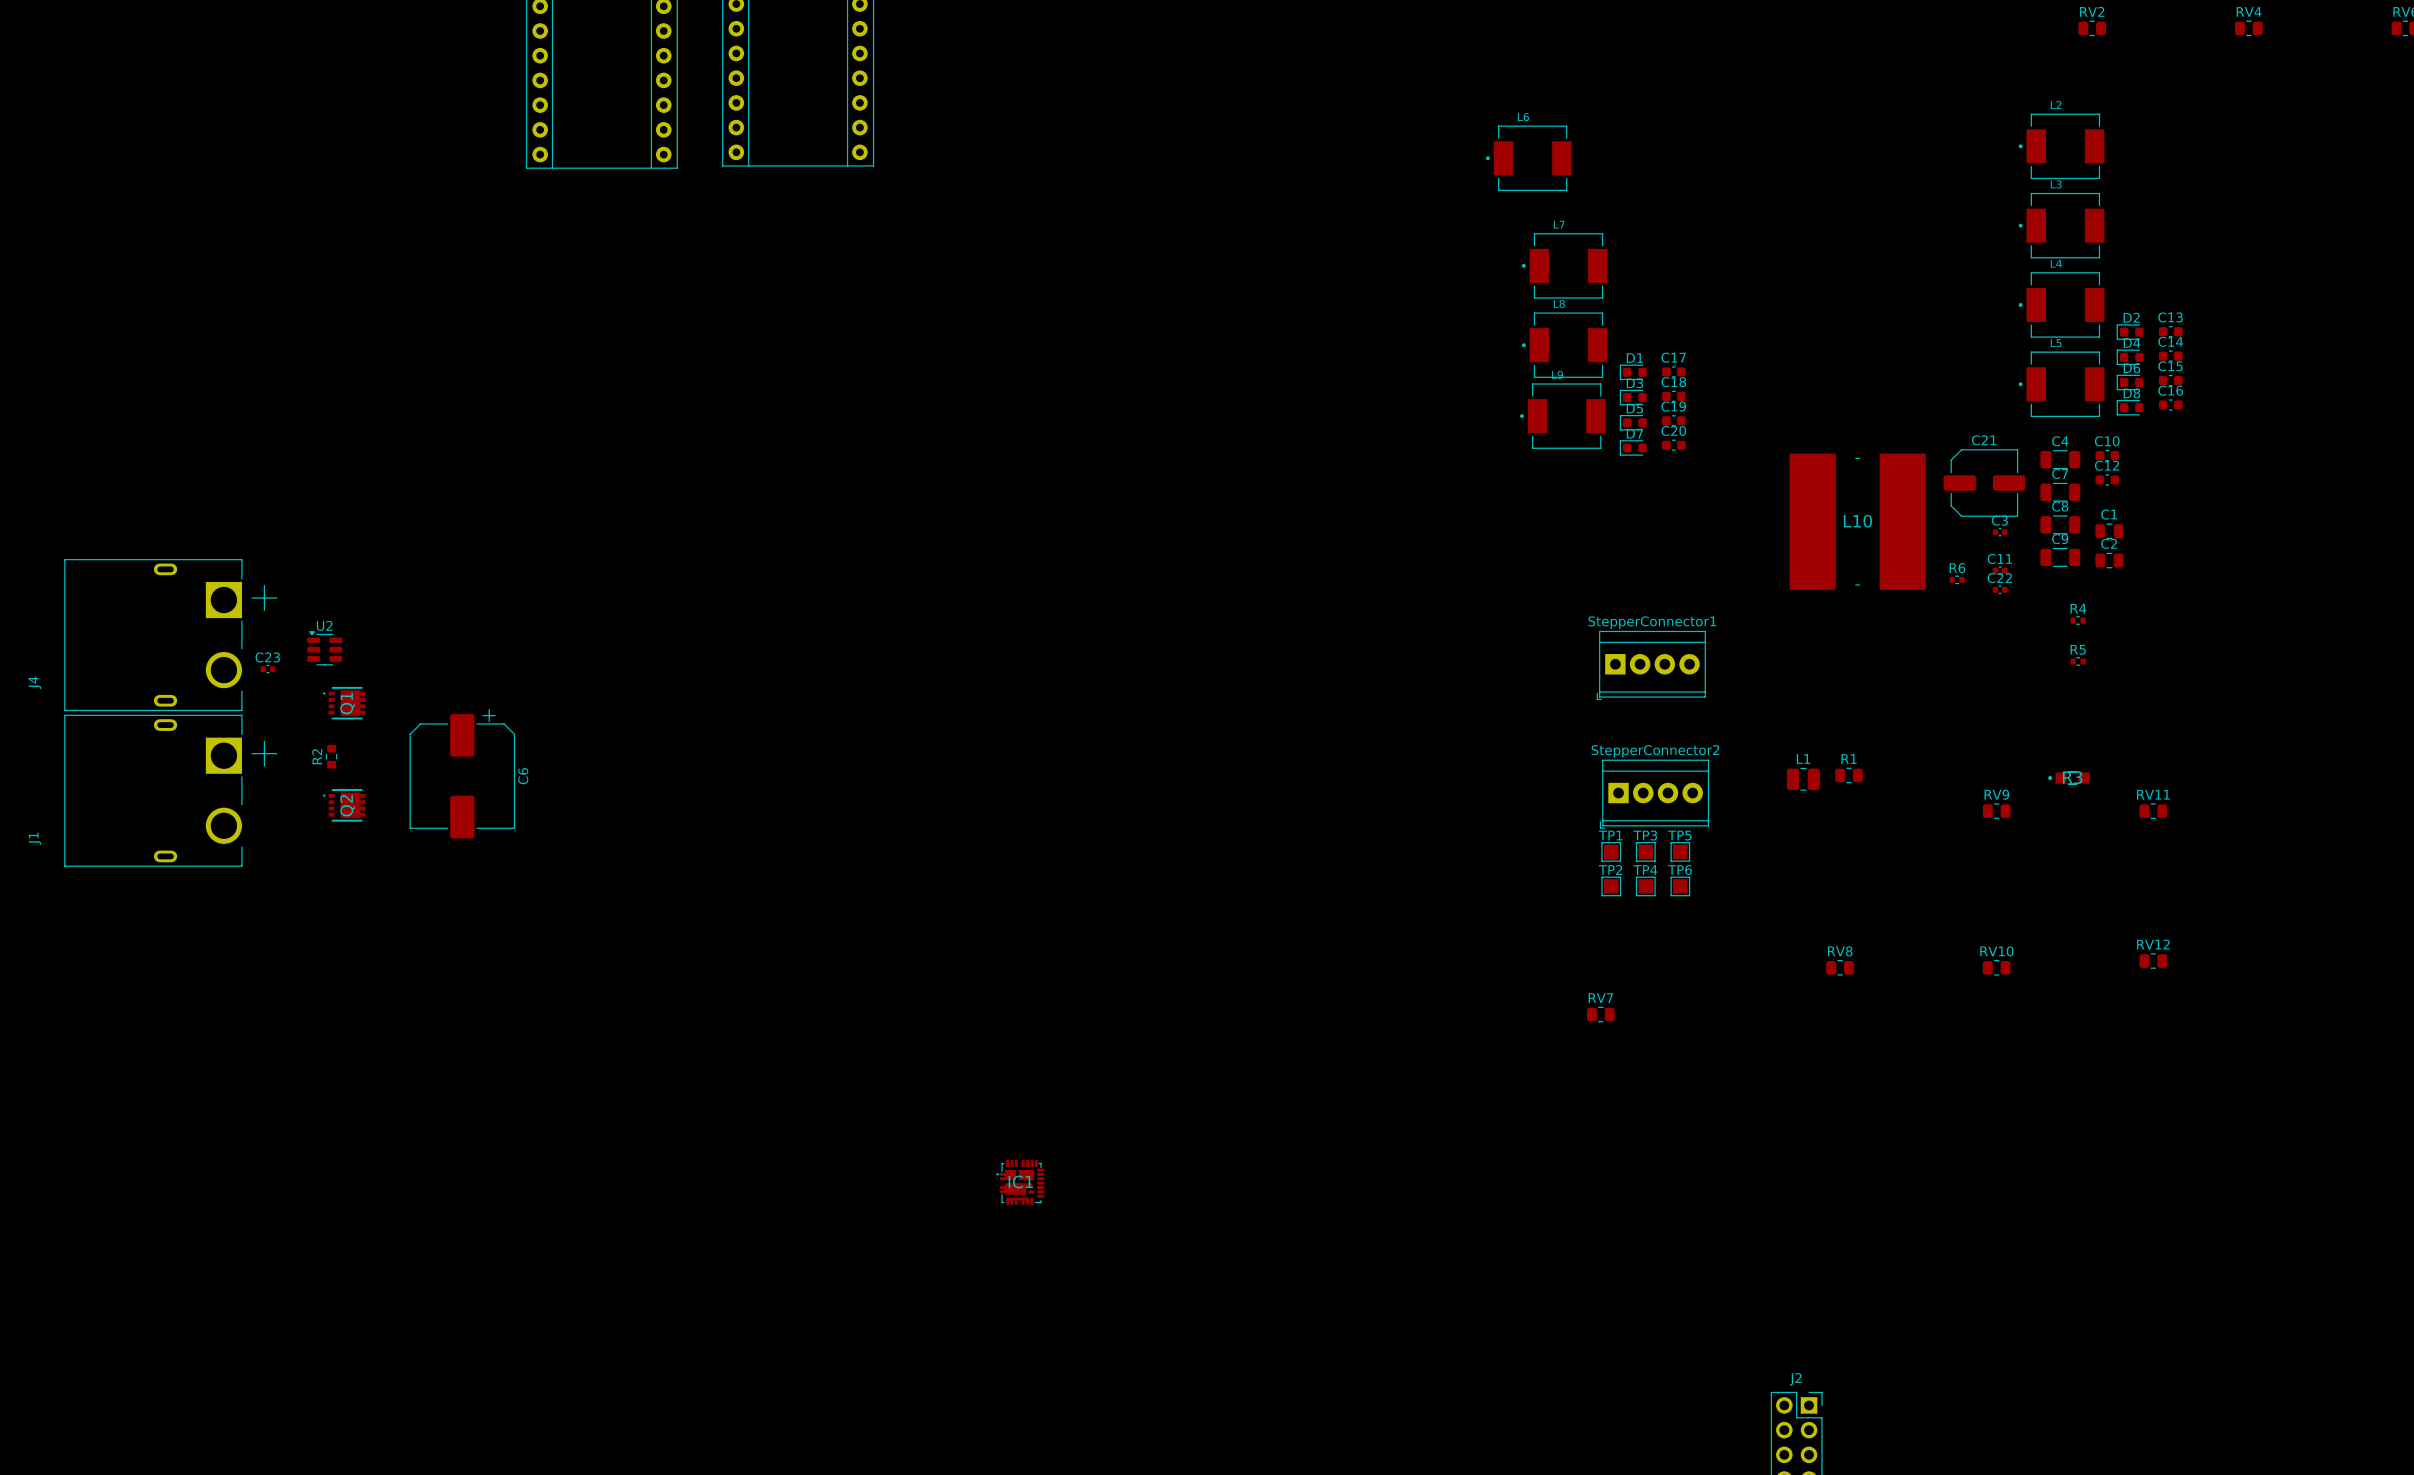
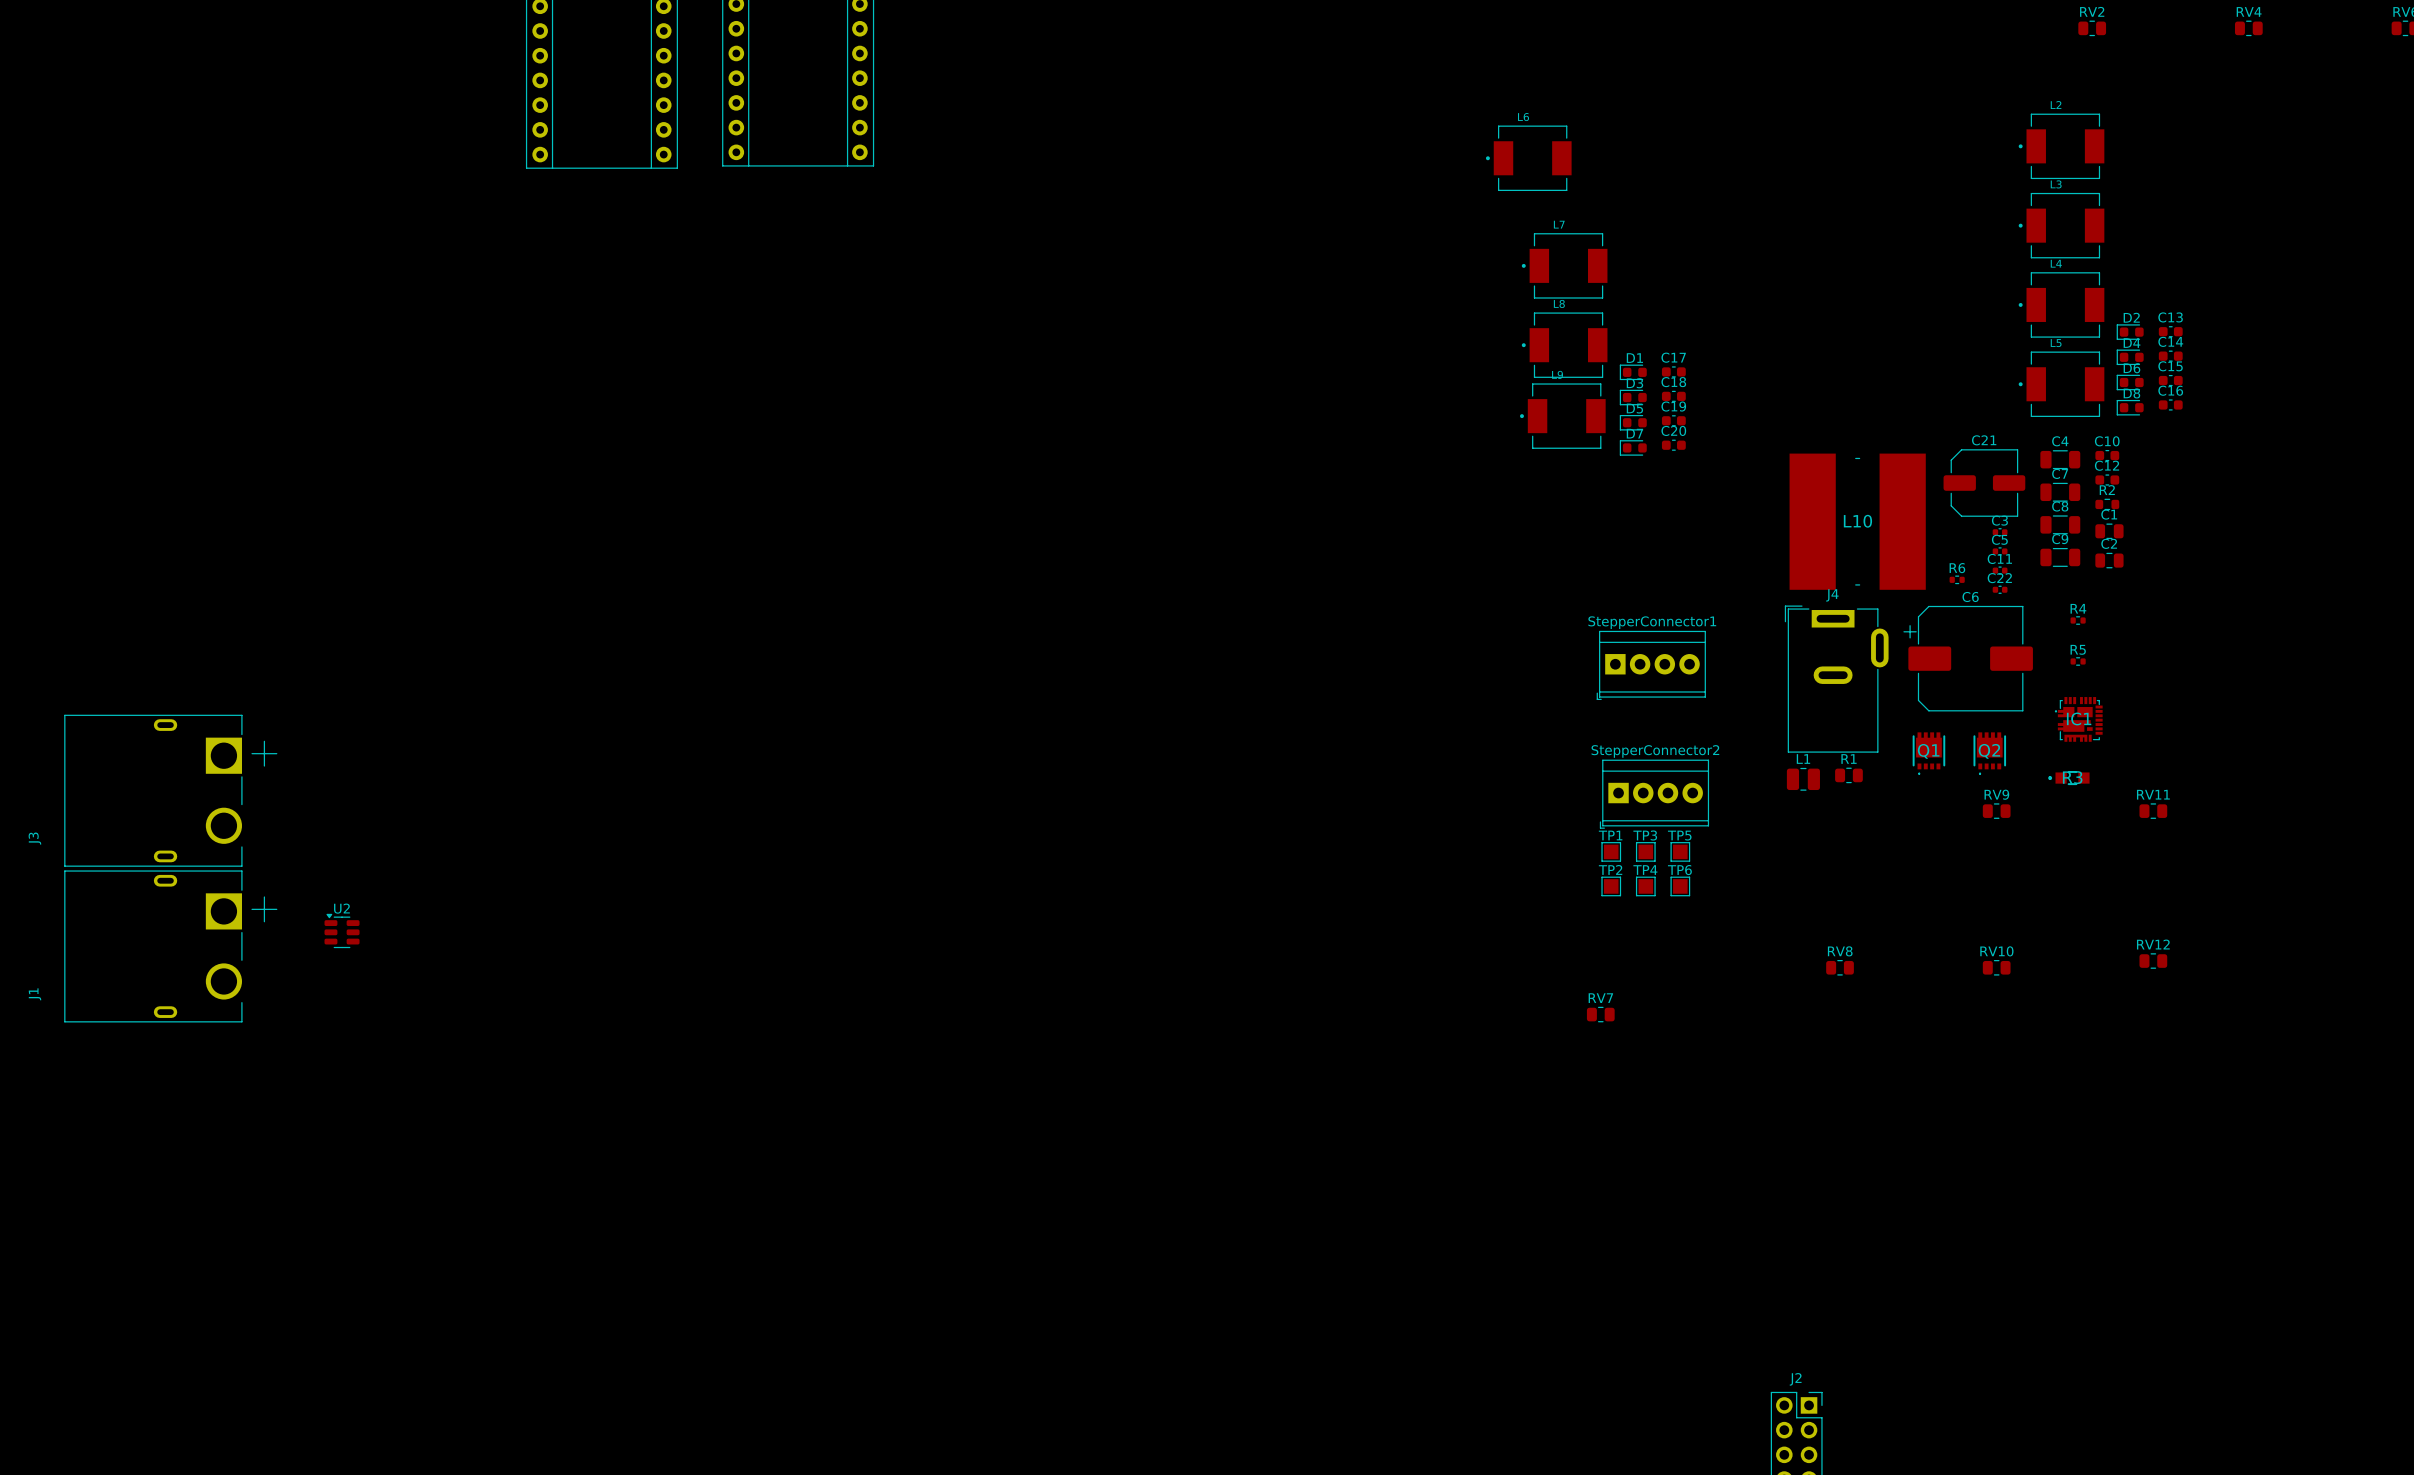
C5: none -> (2000, 551)
J4 footprint: [64, 559, 278, 712] -> [1784, 605, 1889, 753]
U2 position: (324, 648) -> (342, 930)
C23: (267, 669) -> none
J4 name position: J4 (35, 682) -> J4 (1832, 595)
Q1 rotation: 0° (344, 703) -> 90° counterclockwise (1928, 753)
Q1 position: (344, 703) -> (1928, 753)
R2 rotation: 0° (331, 756) -> 90° clockwise (2107, 504)
R2 position: (331, 756) -> (2107, 504)
C6 rotation: 0° (462, 773) -> 90° counterclockwise (1968, 658)
C6 position: (462, 773) -> (1968, 658)
Q2 rotation: 0° (344, 805) -> 90° counterclockwise (1989, 753)
Q2 position: (344, 805) -> (1989, 753)
J1 name: J1 (35, 838) -> J3 (34, 838)
J1: none -> (170, 946)
IC1 position: (1020, 1182) -> (2078, 719)

